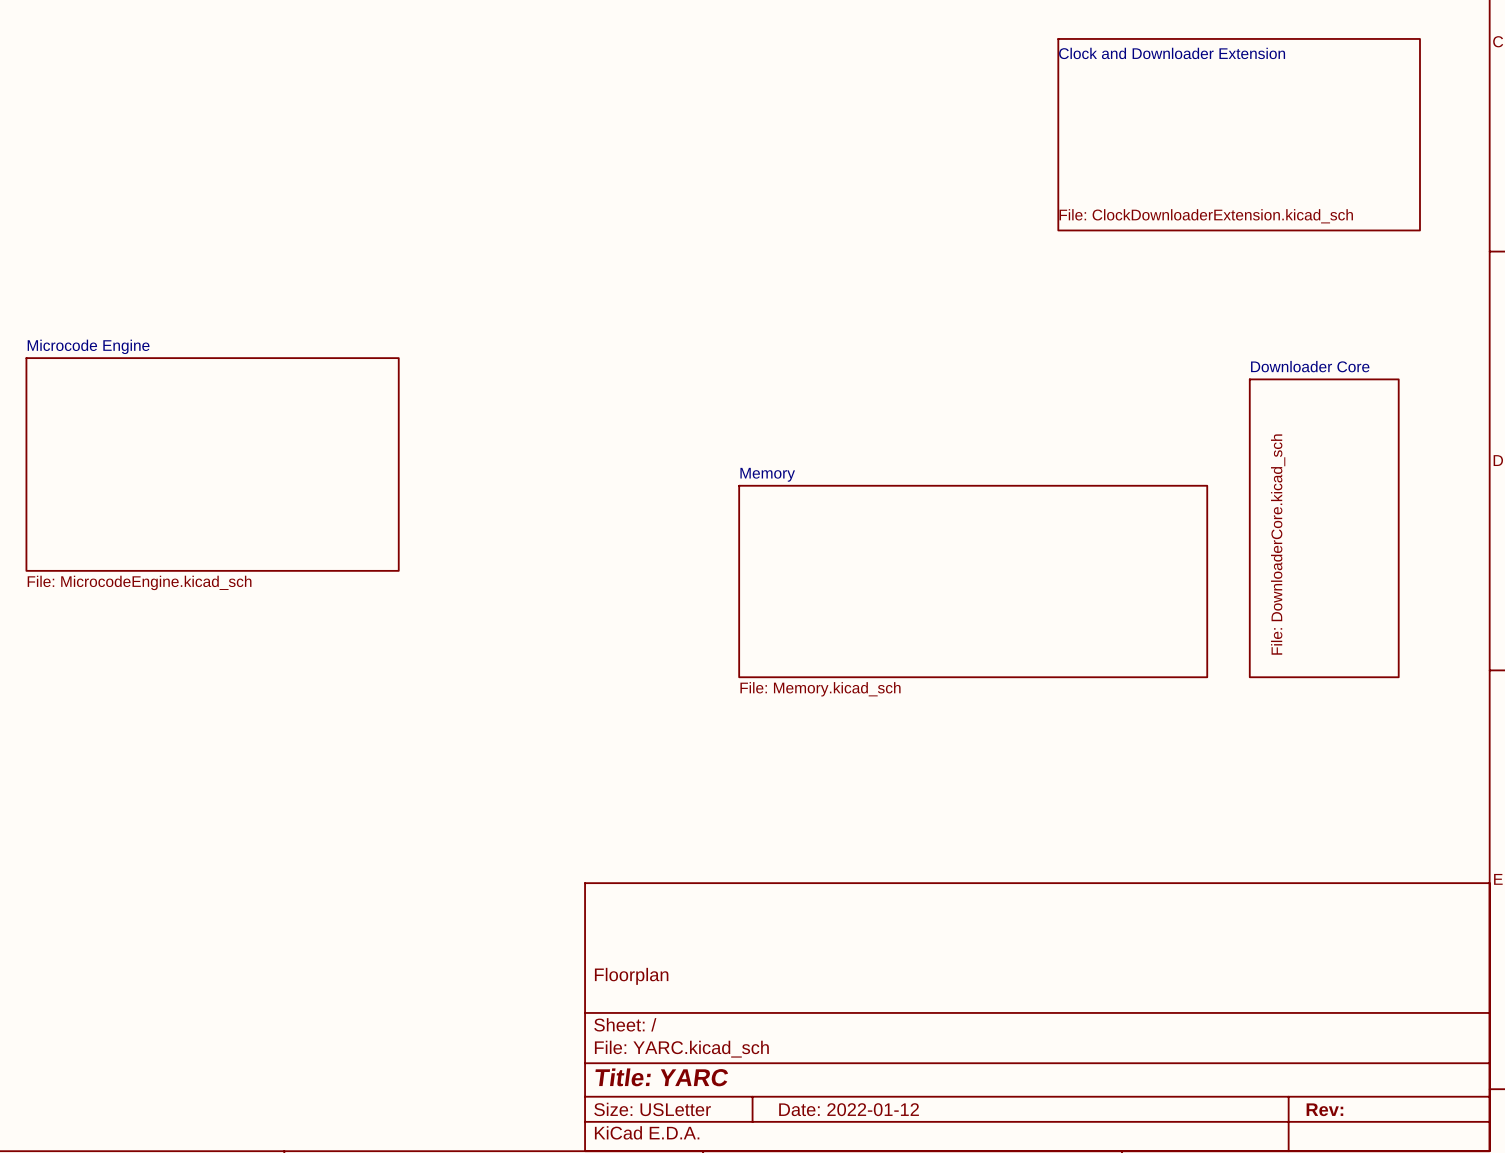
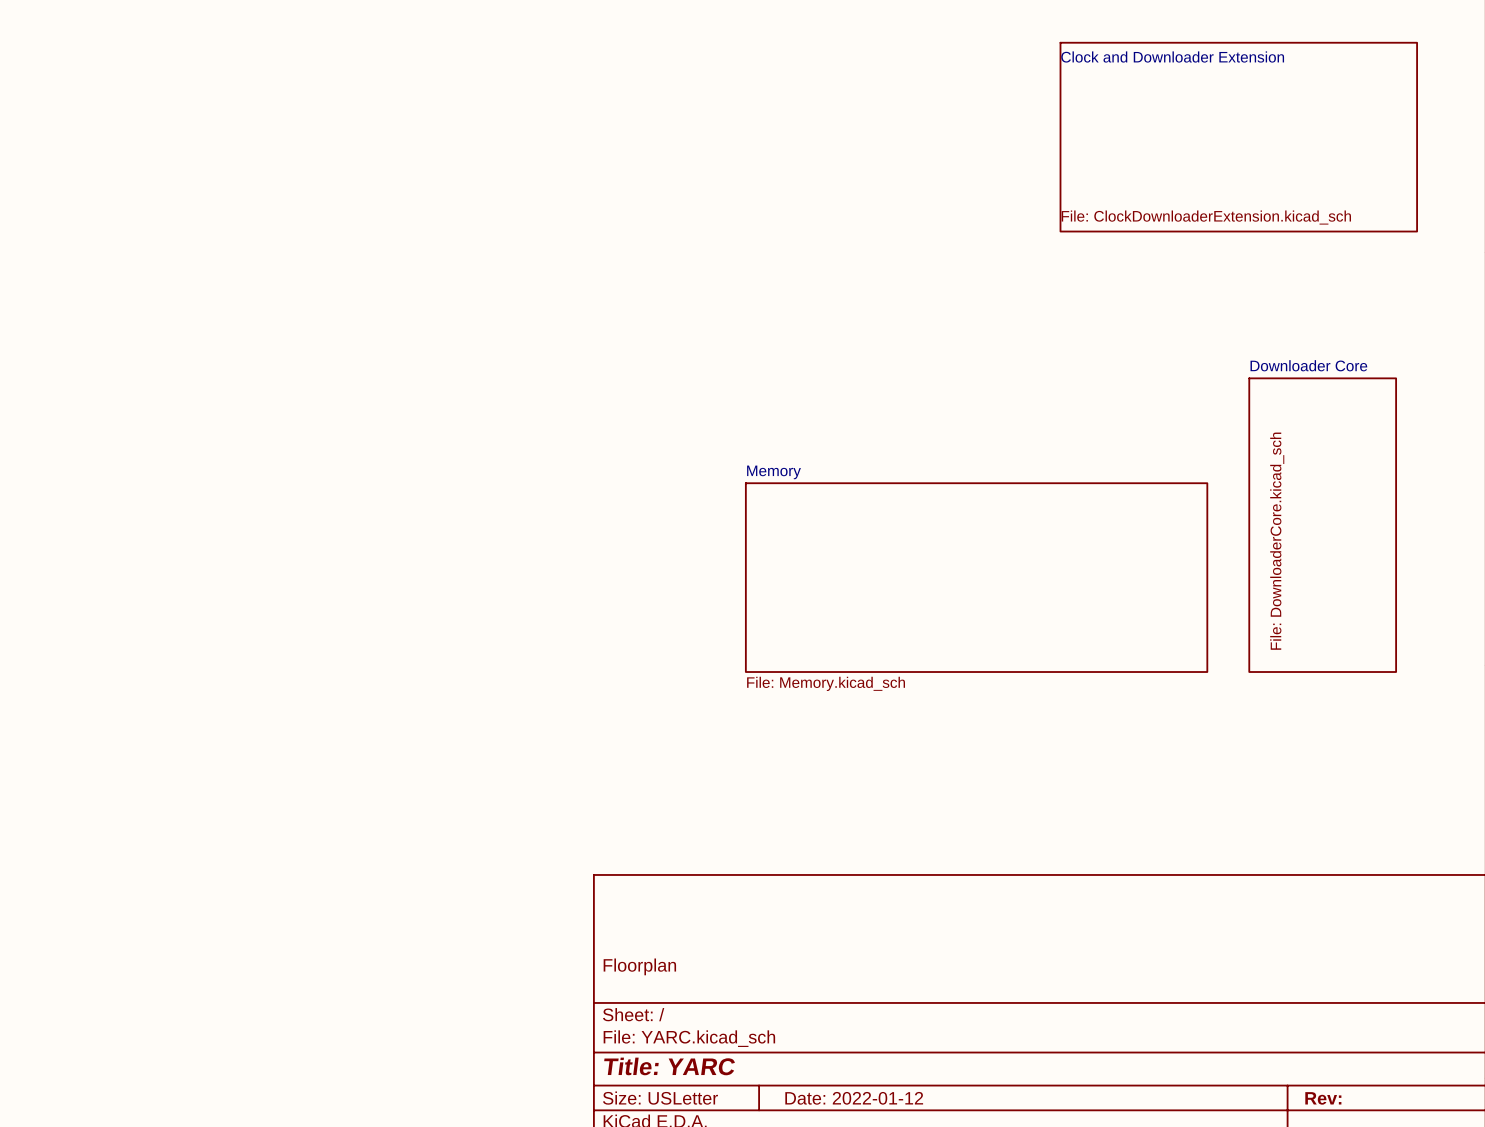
sheet Microcode Engine: File: MicrocodeEngine.kicad_sch (212, 464) -> none

